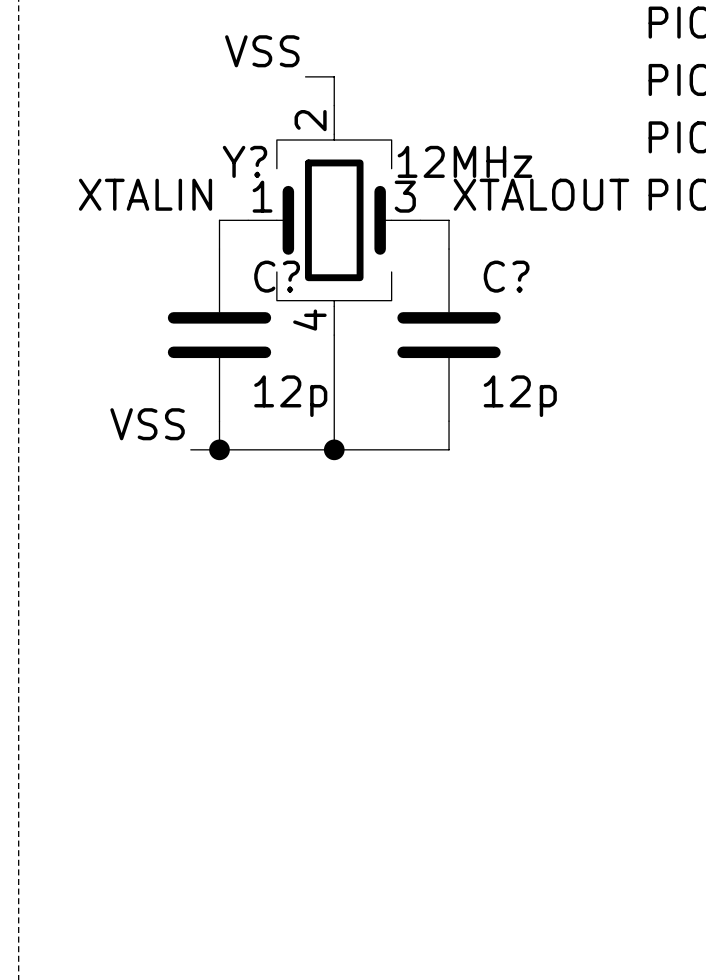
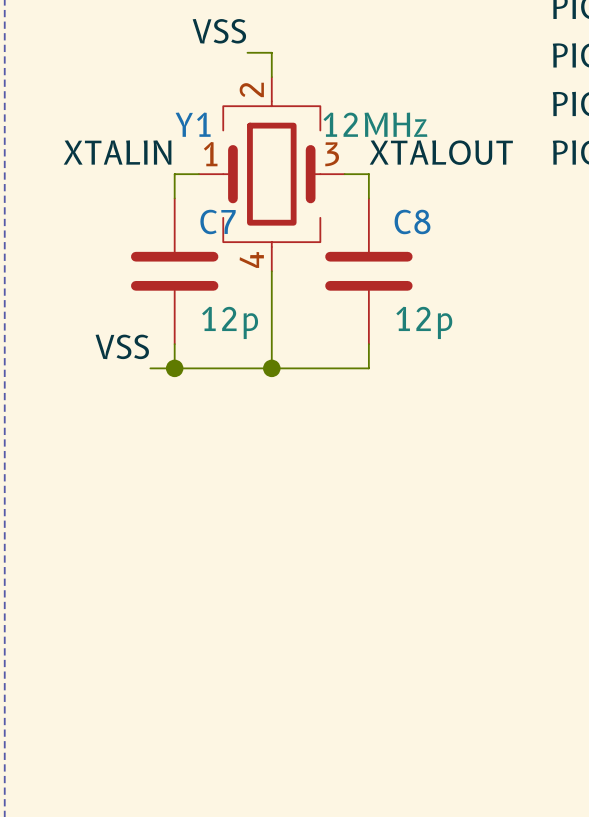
Y? name: Y? (244, 161) -> Y1 (193, 124)
C? name: C? (277, 276) -> C7 (218, 221)
C? name: C? (506, 276) -> C8 (412, 221)

